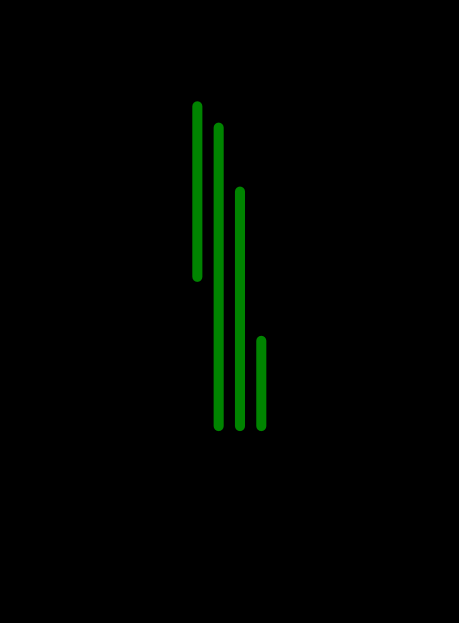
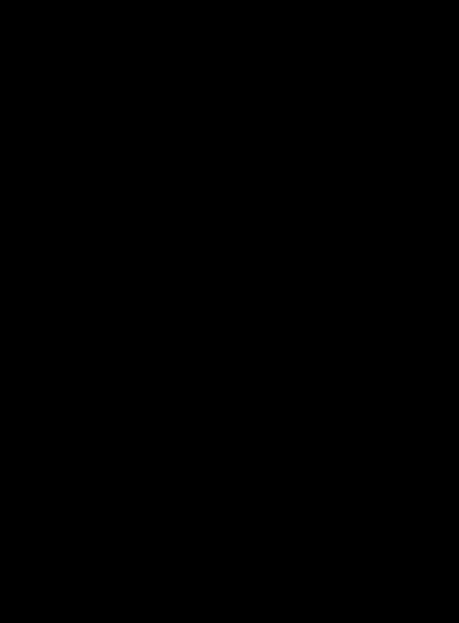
bottom track: (197, 106) (197, 276) -> none
bottom track: (218, 127) (218, 426) -> none
bottom track: (239, 191) (239, 426) -> none
bottom track: (261, 340) (261, 426) -> none

